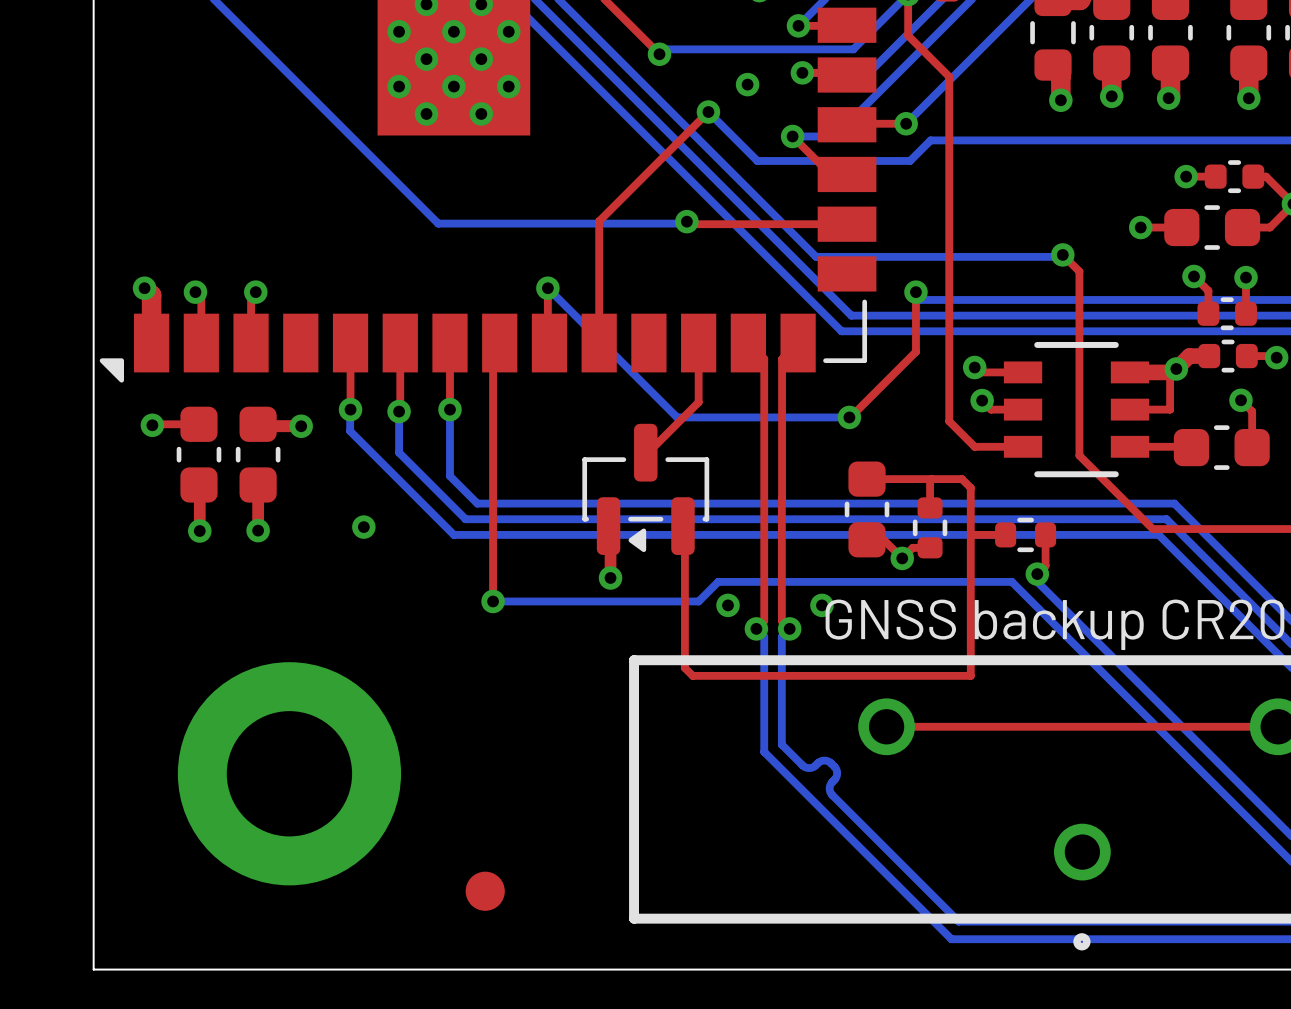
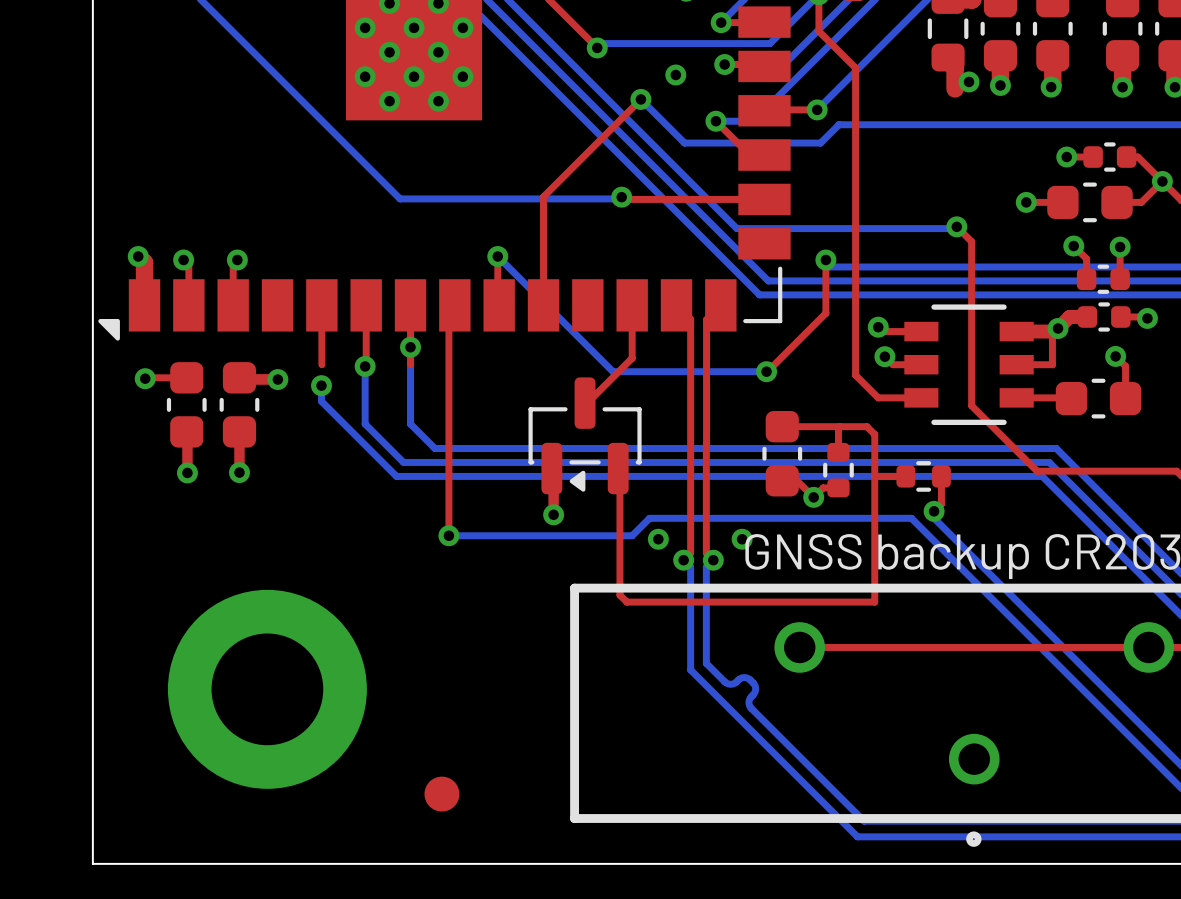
via position: (1060, 100) -> (969, 81)
via position: (350, 409) -> (321, 385)
via position: (449, 409) -> (410, 347)
bottom track: (350, 410) (350, 431) (453, 534) -> (321, 385) (321, 401) (396, 476) (414, 476)
bottom track: (399, 452) (465, 519) -> (365, 403) (365, 424) (403, 462) (424, 462)
via: (363, 527) -> none

